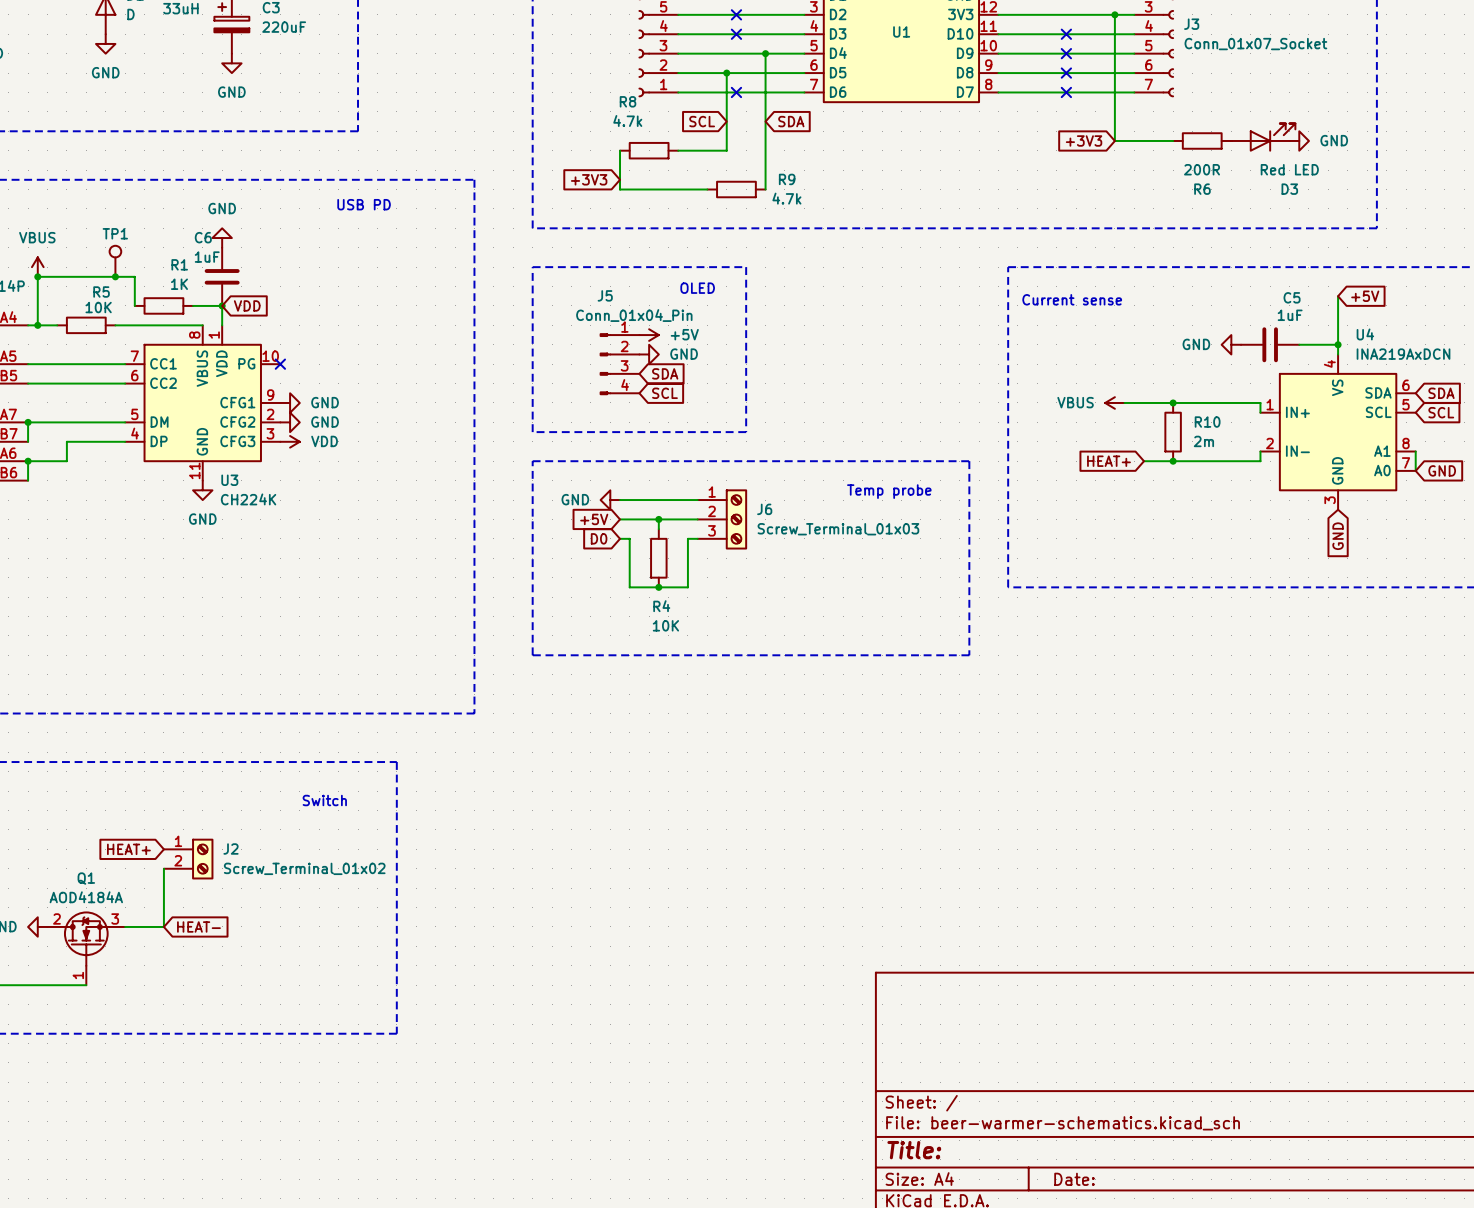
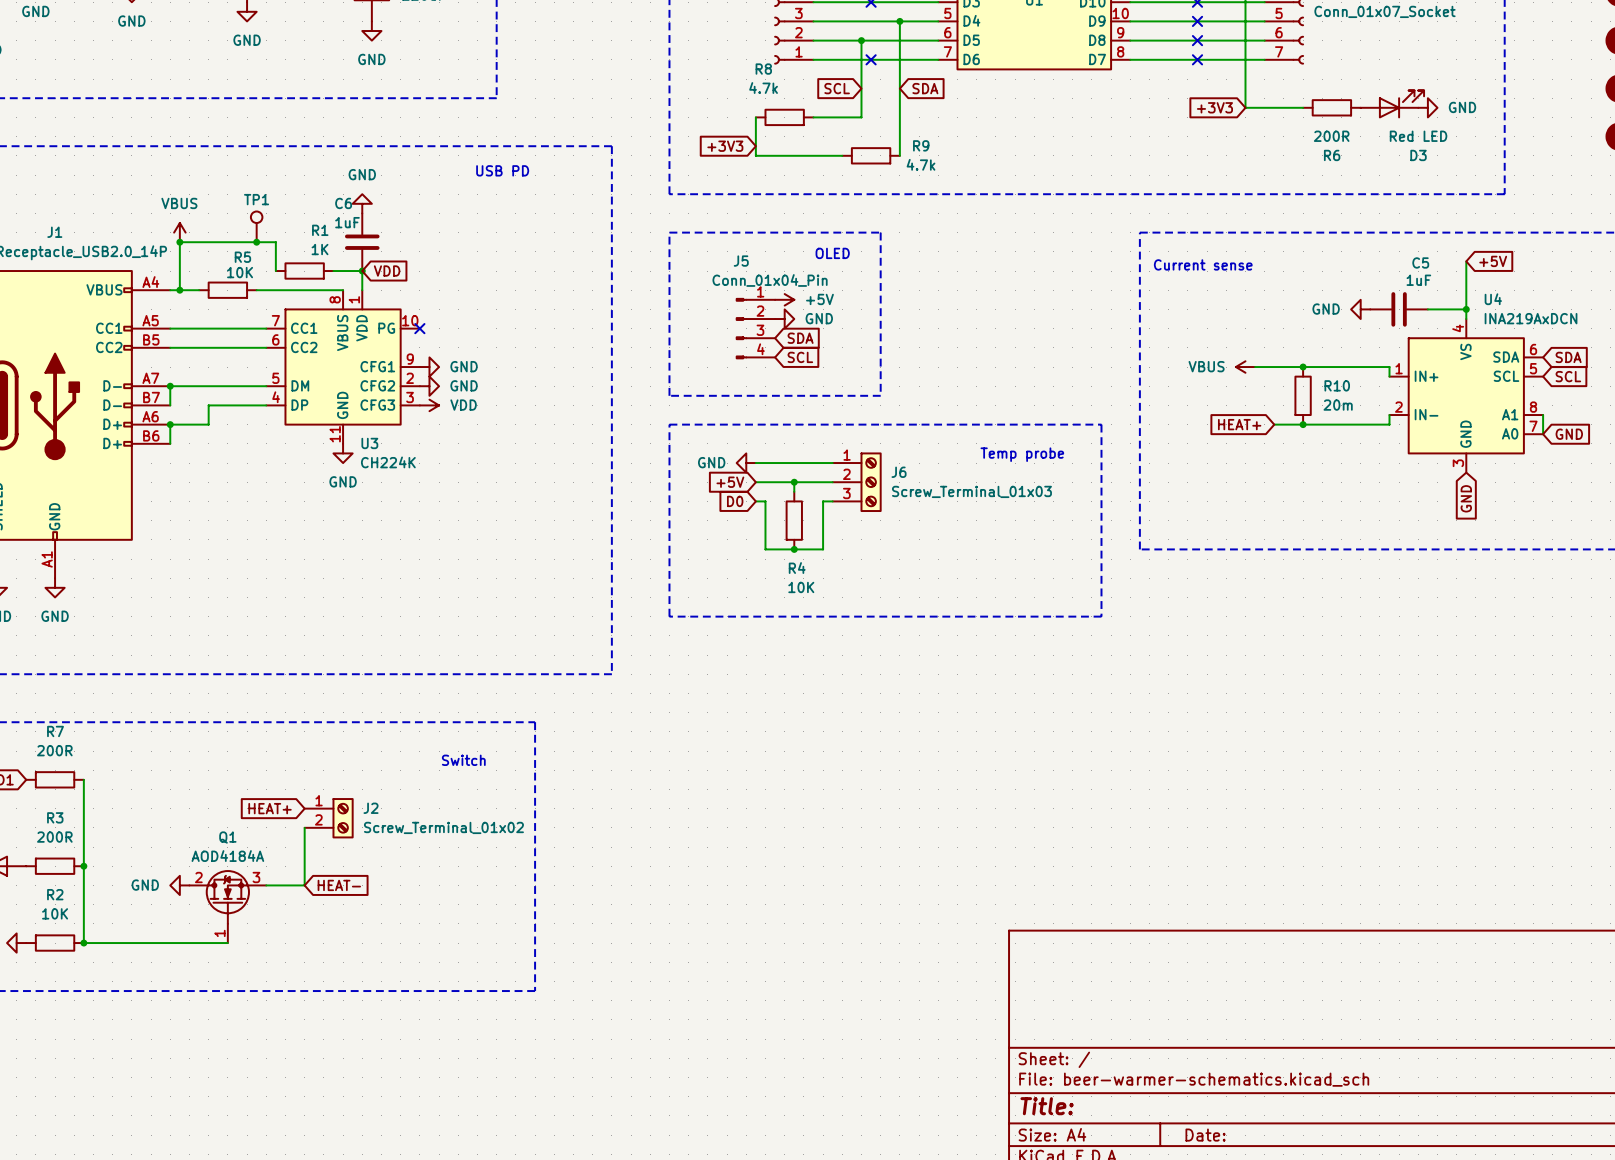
R10 value: 2m (1203, 441) -> 20m (1338, 405)

